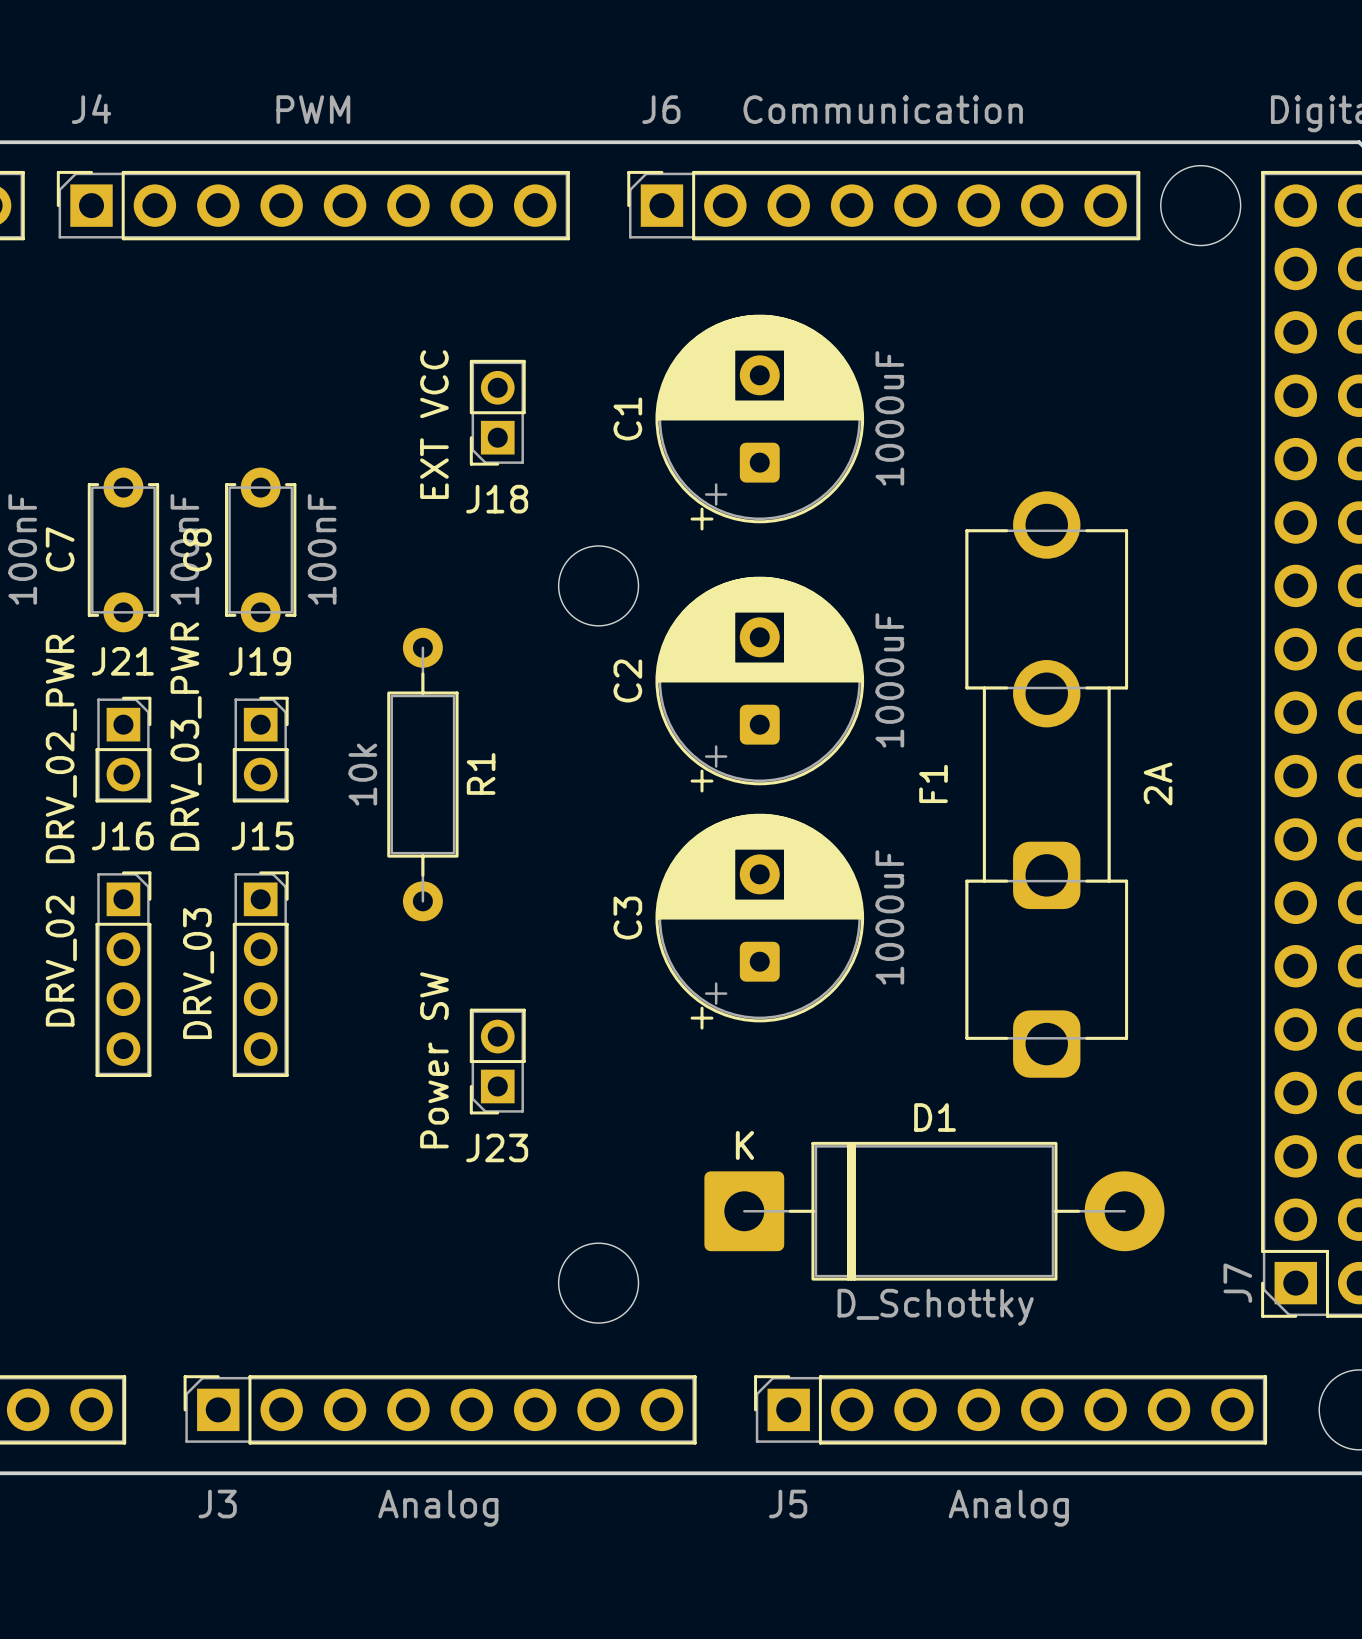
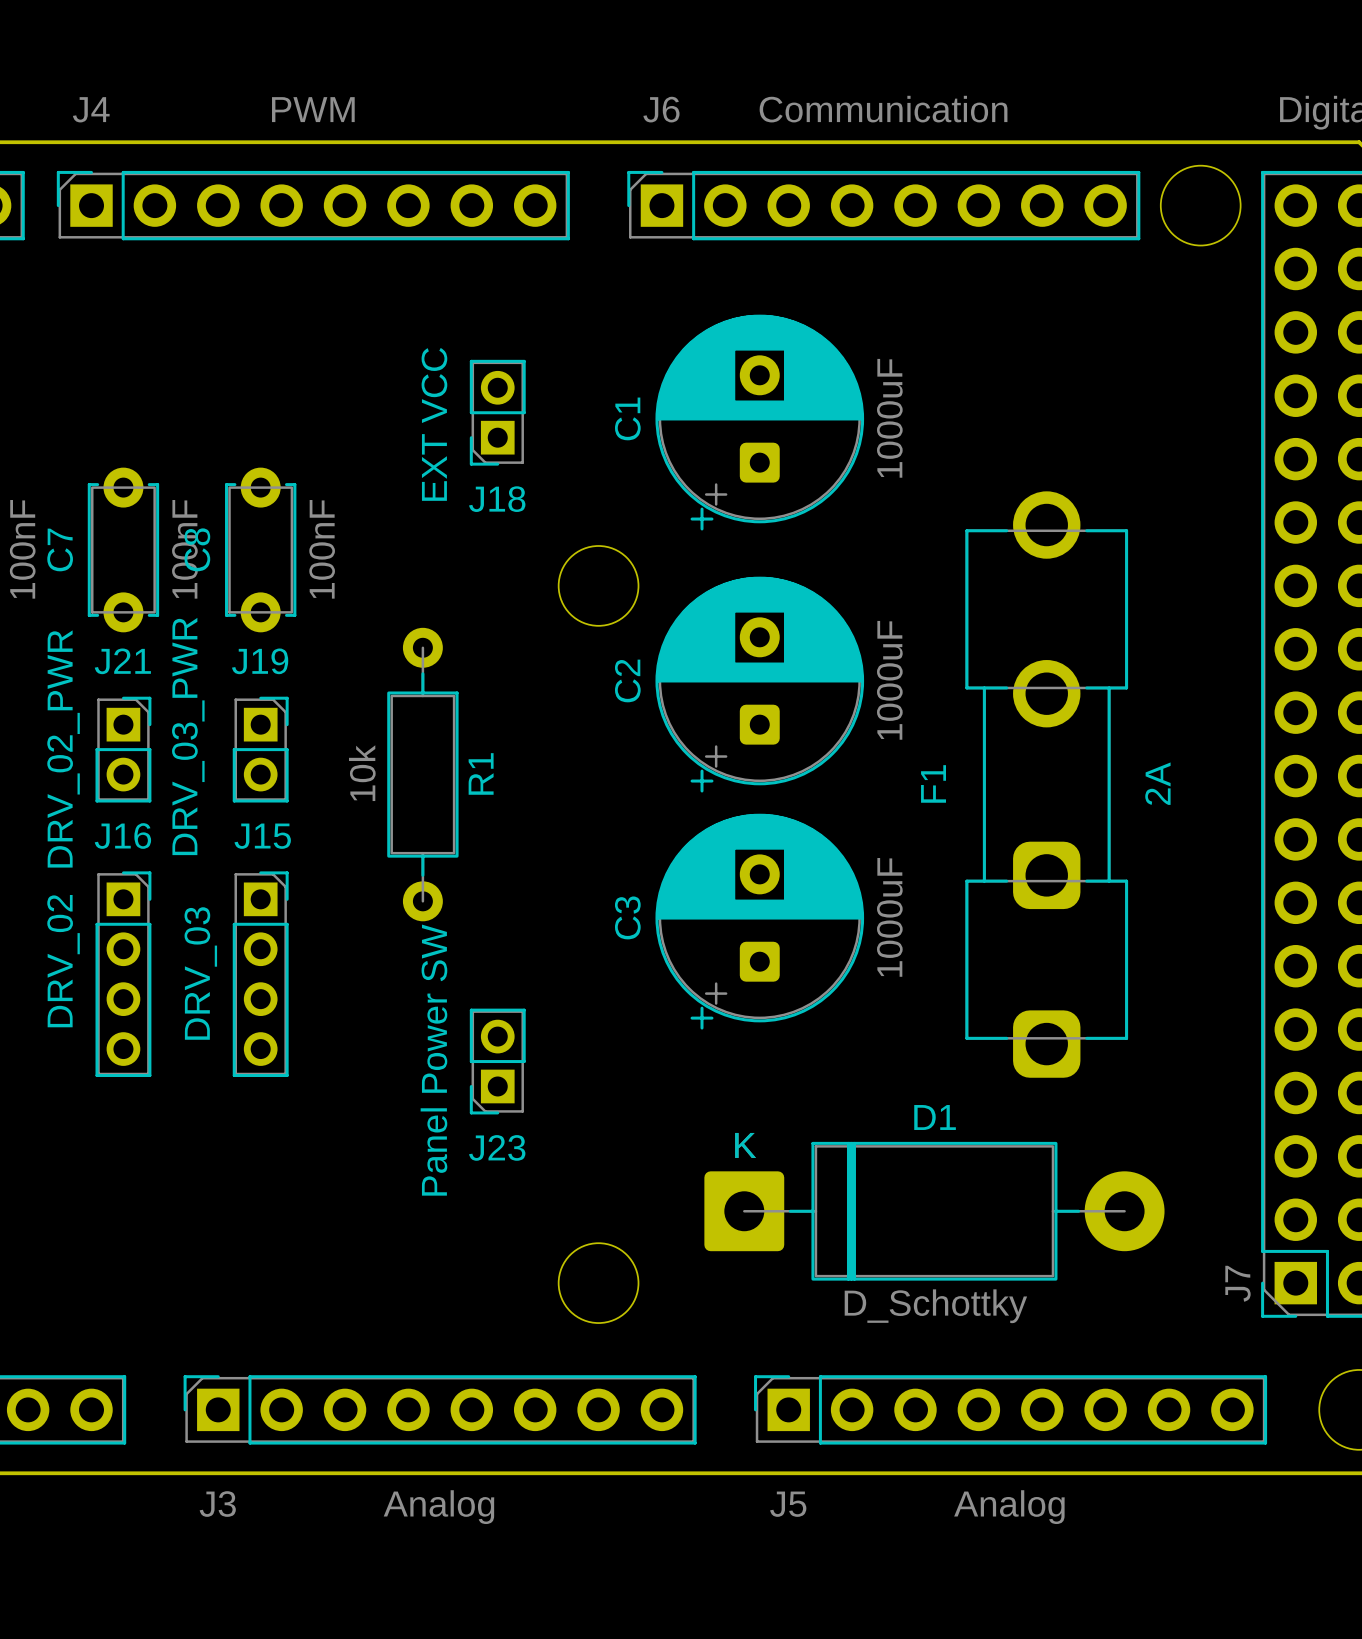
J23 value: Power SW (434, 1060) -> Panel Power SW (433, 1060)

